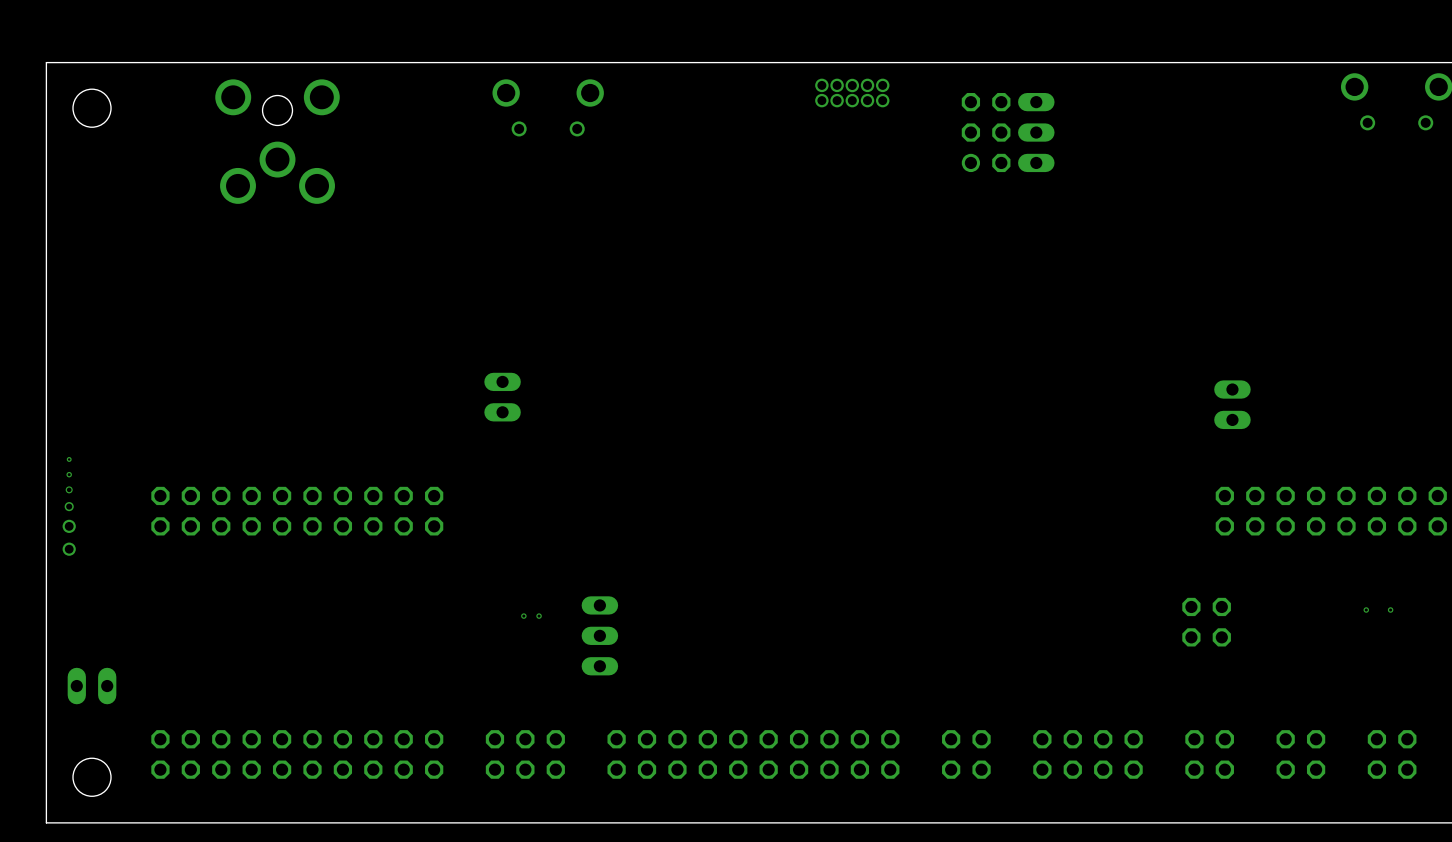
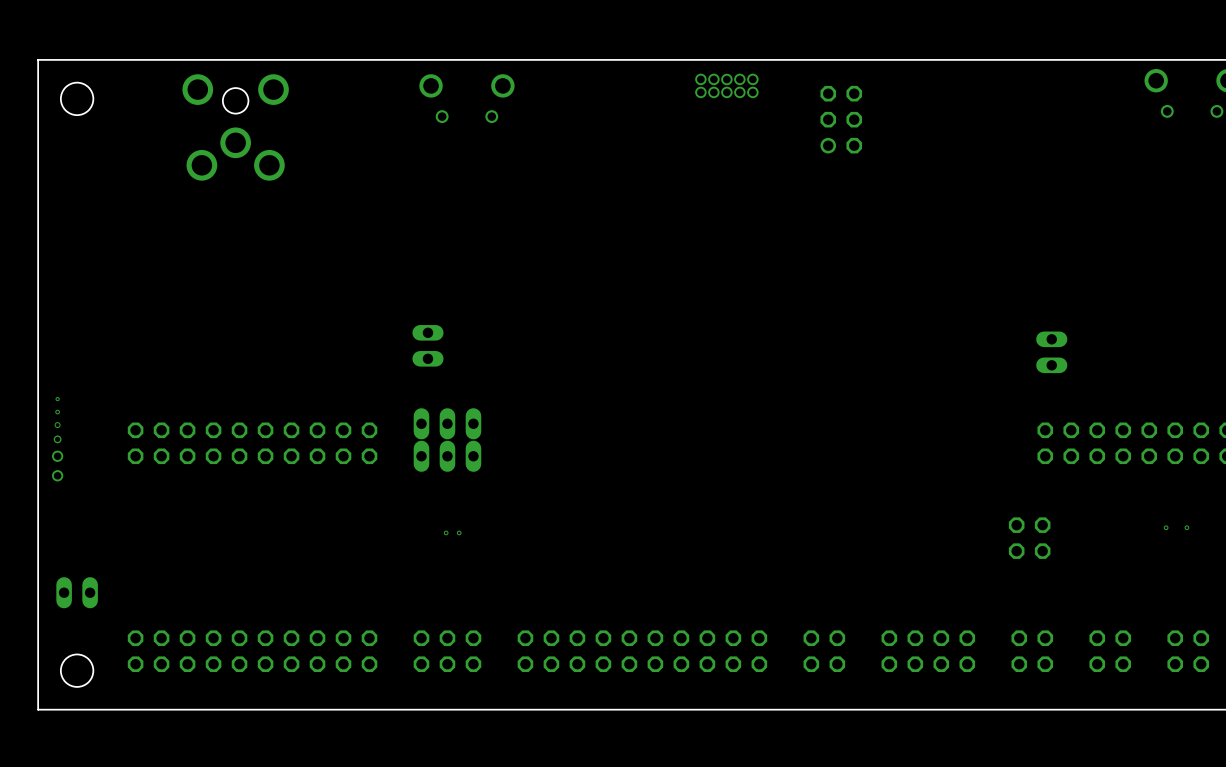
part: (1036, 132) -> none
part: none -> (447, 423)
part: none -> (447, 456)
part: (599, 635) -> none

